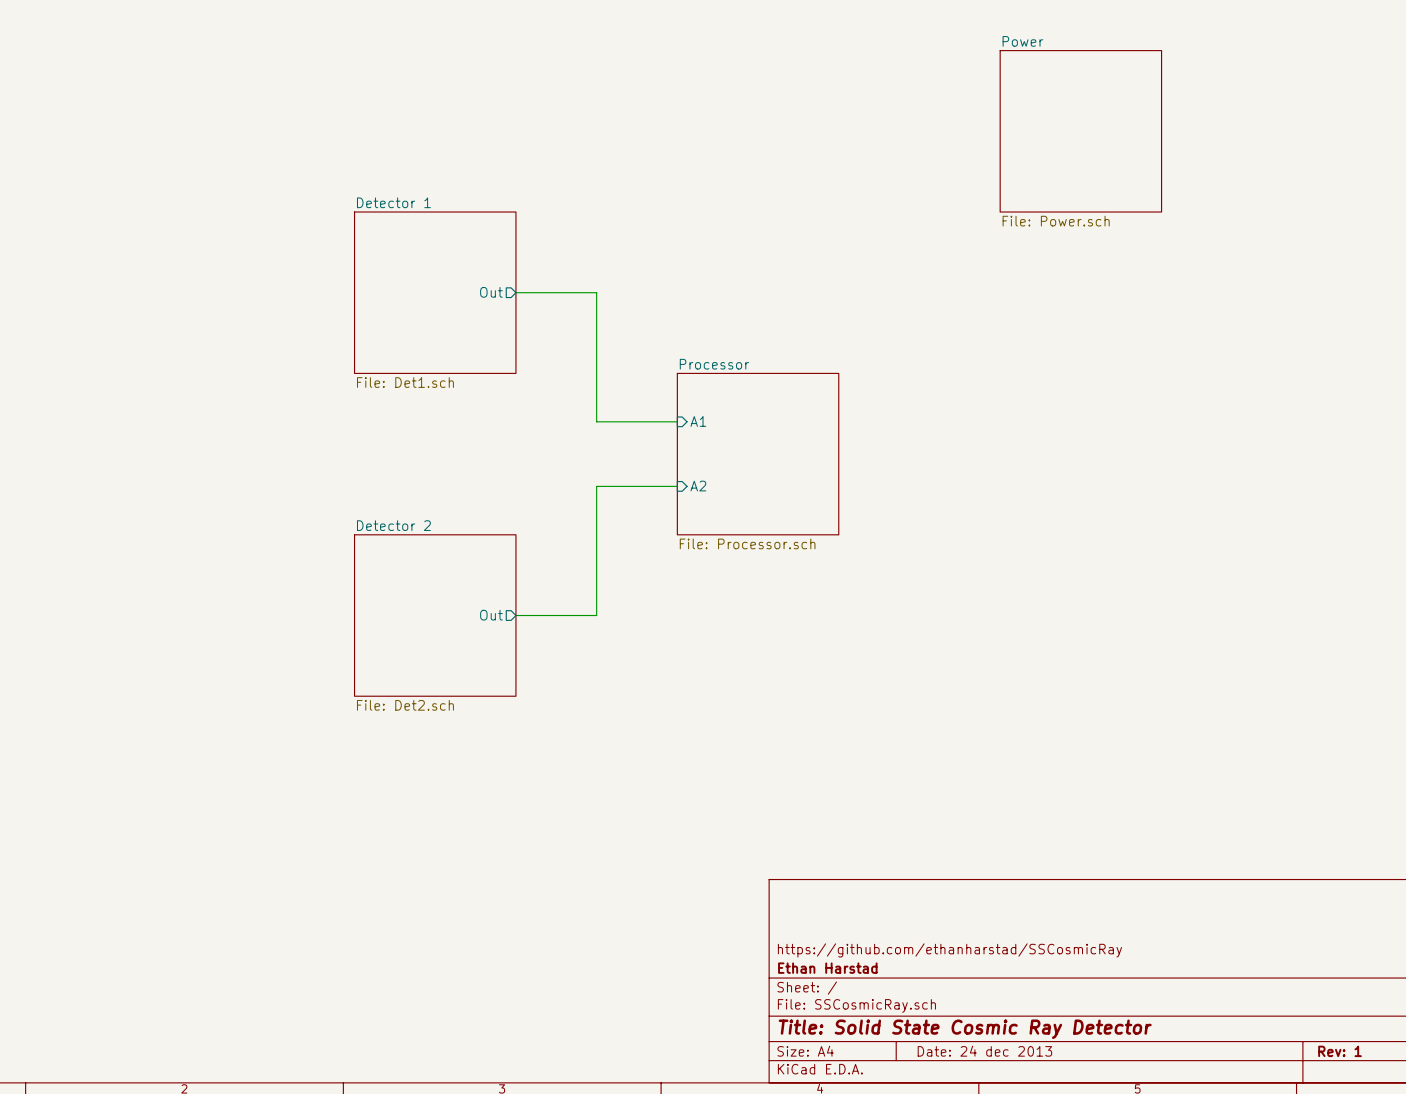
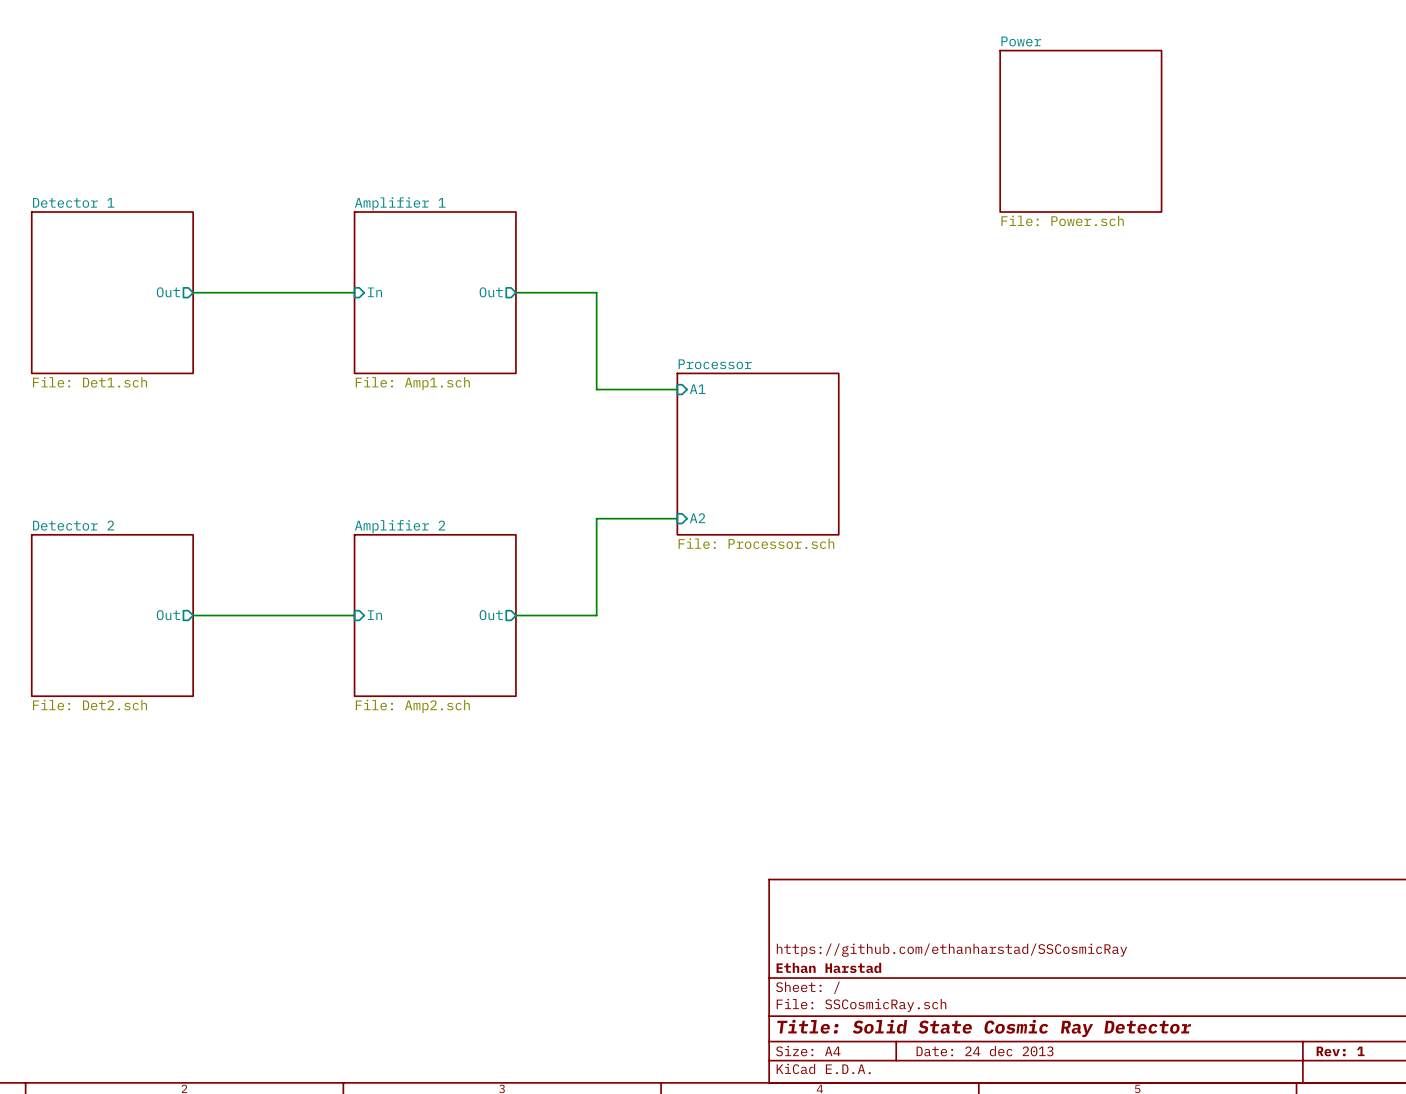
sheet Detector 1 name: Detector 1 (393, 202) -> Amplifier 1 (400, 203)
sheet Detector 1: none -> File: Det1.sch (112, 292)
sheet pin: none -> Out (168, 292)
wire: none -> (193, 292) (354, 292)
sheet pin: none -> In (374, 292)
sheet Detector 1 value: File: Det1.sch (405, 382) -> File: Amp1.sch (412, 383)
wire: (596, 389) (596, 421) (677, 421) -> (596, 389) (677, 389)
sheet pin position: A1 (698, 421) -> A1 (697, 389)
wire: (677, 486) (596, 486) (596, 518) -> (677, 518) (596, 518)
sheet pin position: A2 (698, 486) -> A2 (697, 518)
sheet Detector 2 name: Detector 2 (393, 525) -> Amplifier 2 (400, 526)
sheet Detector 2: none -> File: Det2.sch (112, 615)
sheet pin: none -> Out (168, 615)
wire: none -> (193, 615) (354, 615)
sheet pin: none -> In (374, 615)
sheet Detector 2 value: File: Det2.sch (405, 705) -> File: Amp2.sch (412, 706)

